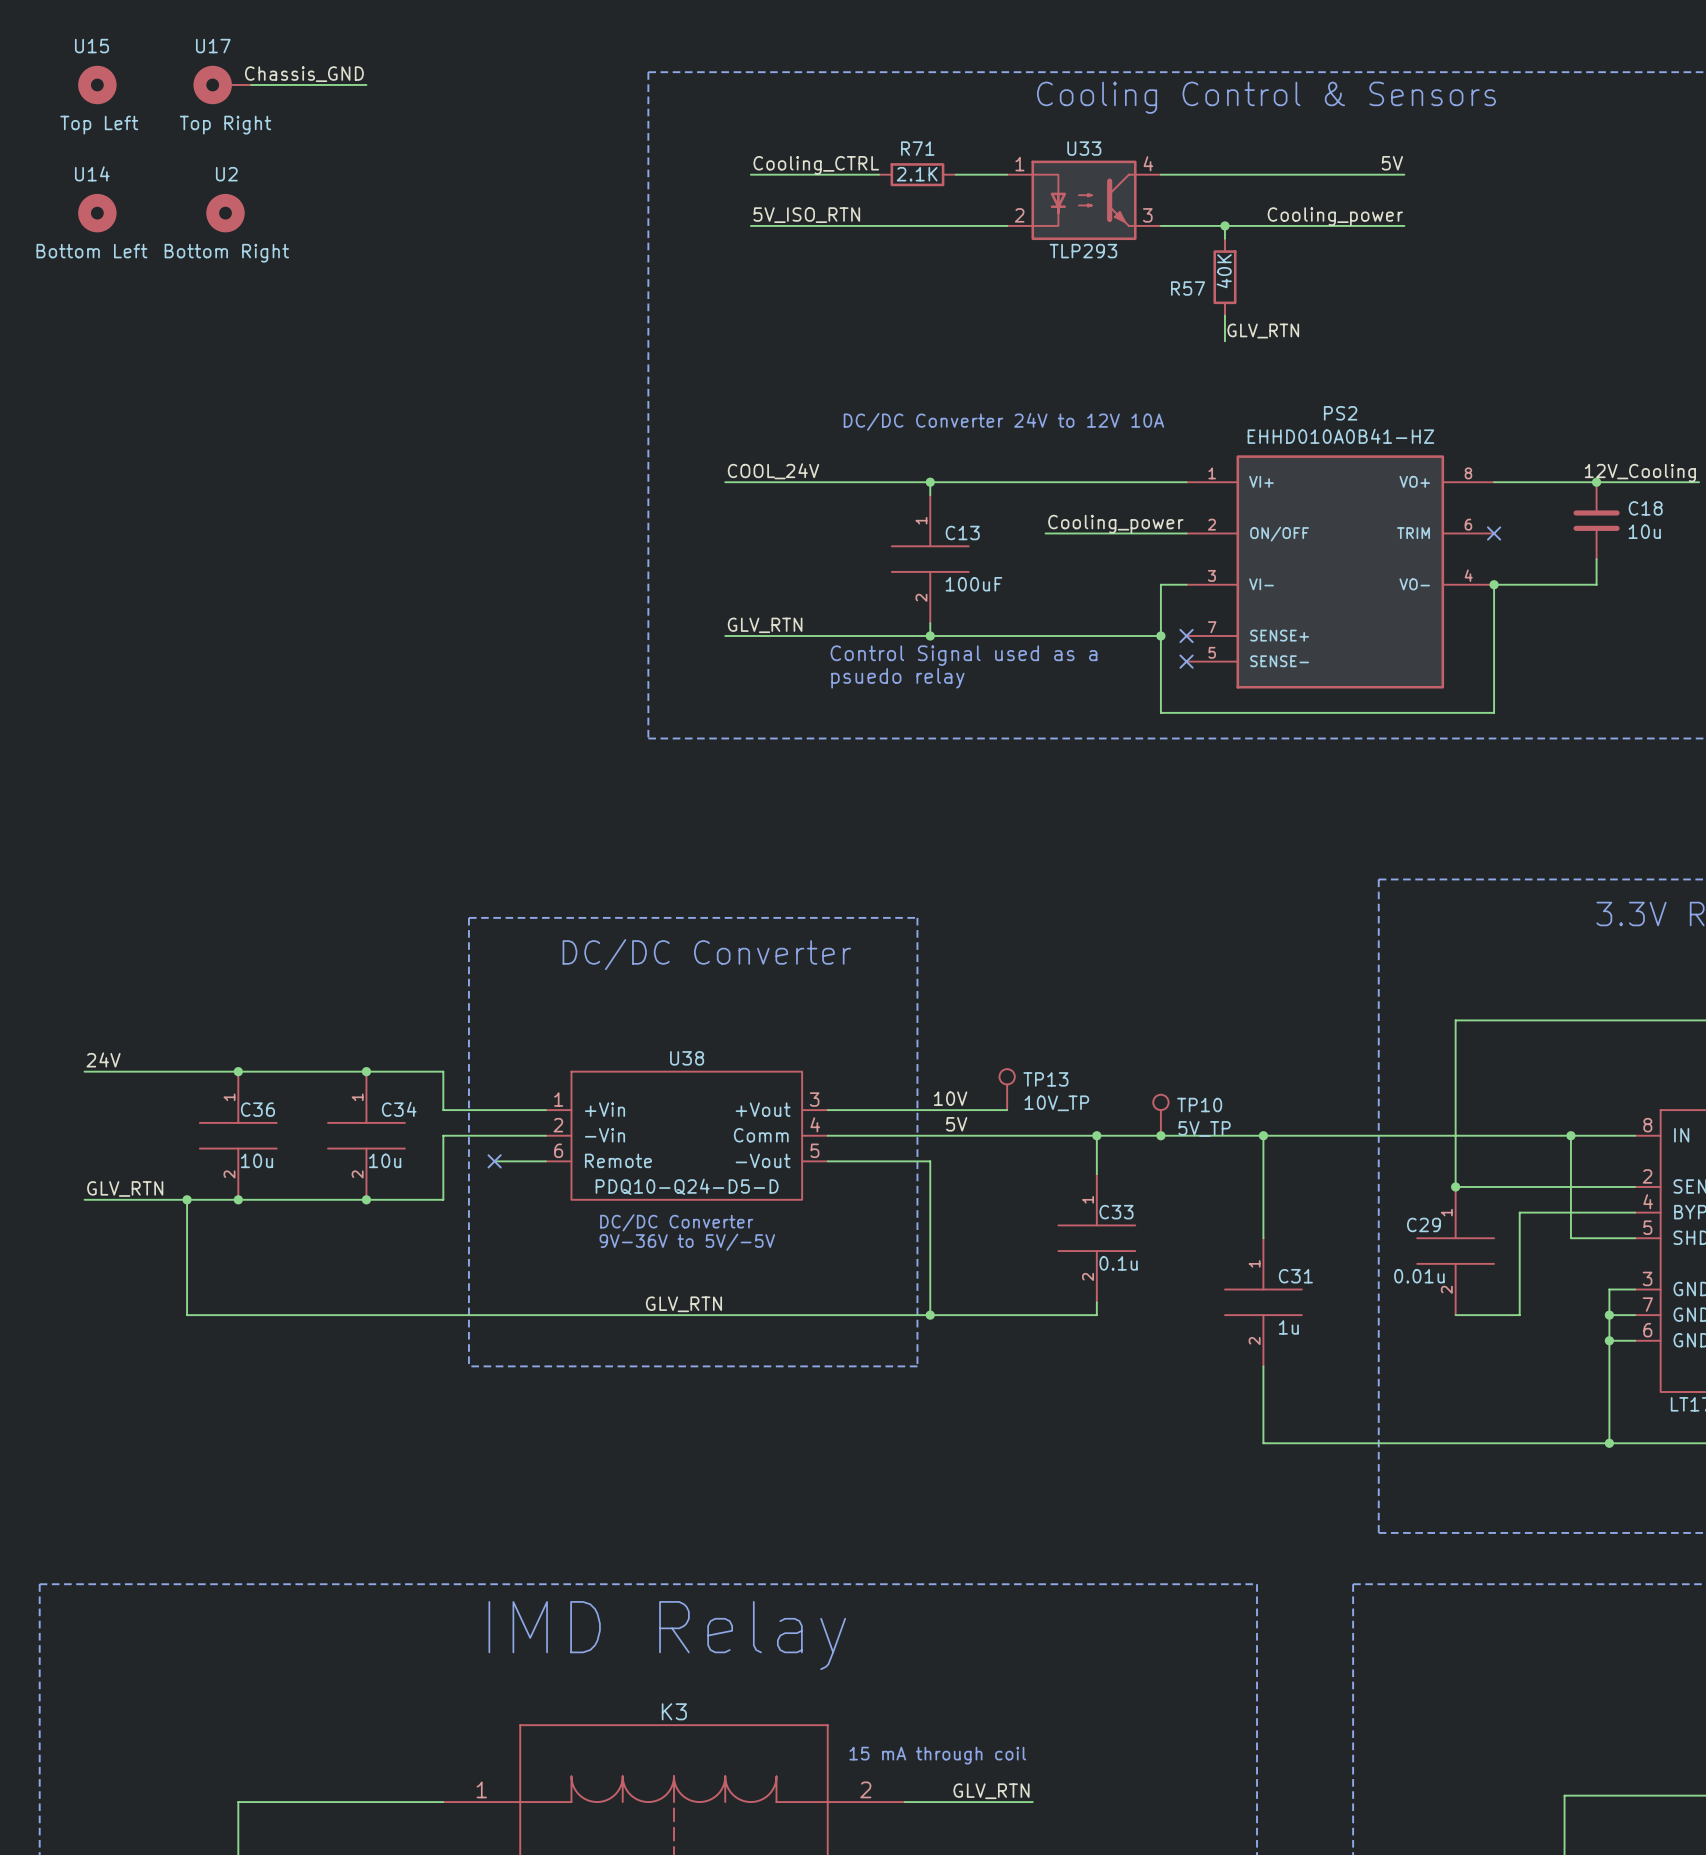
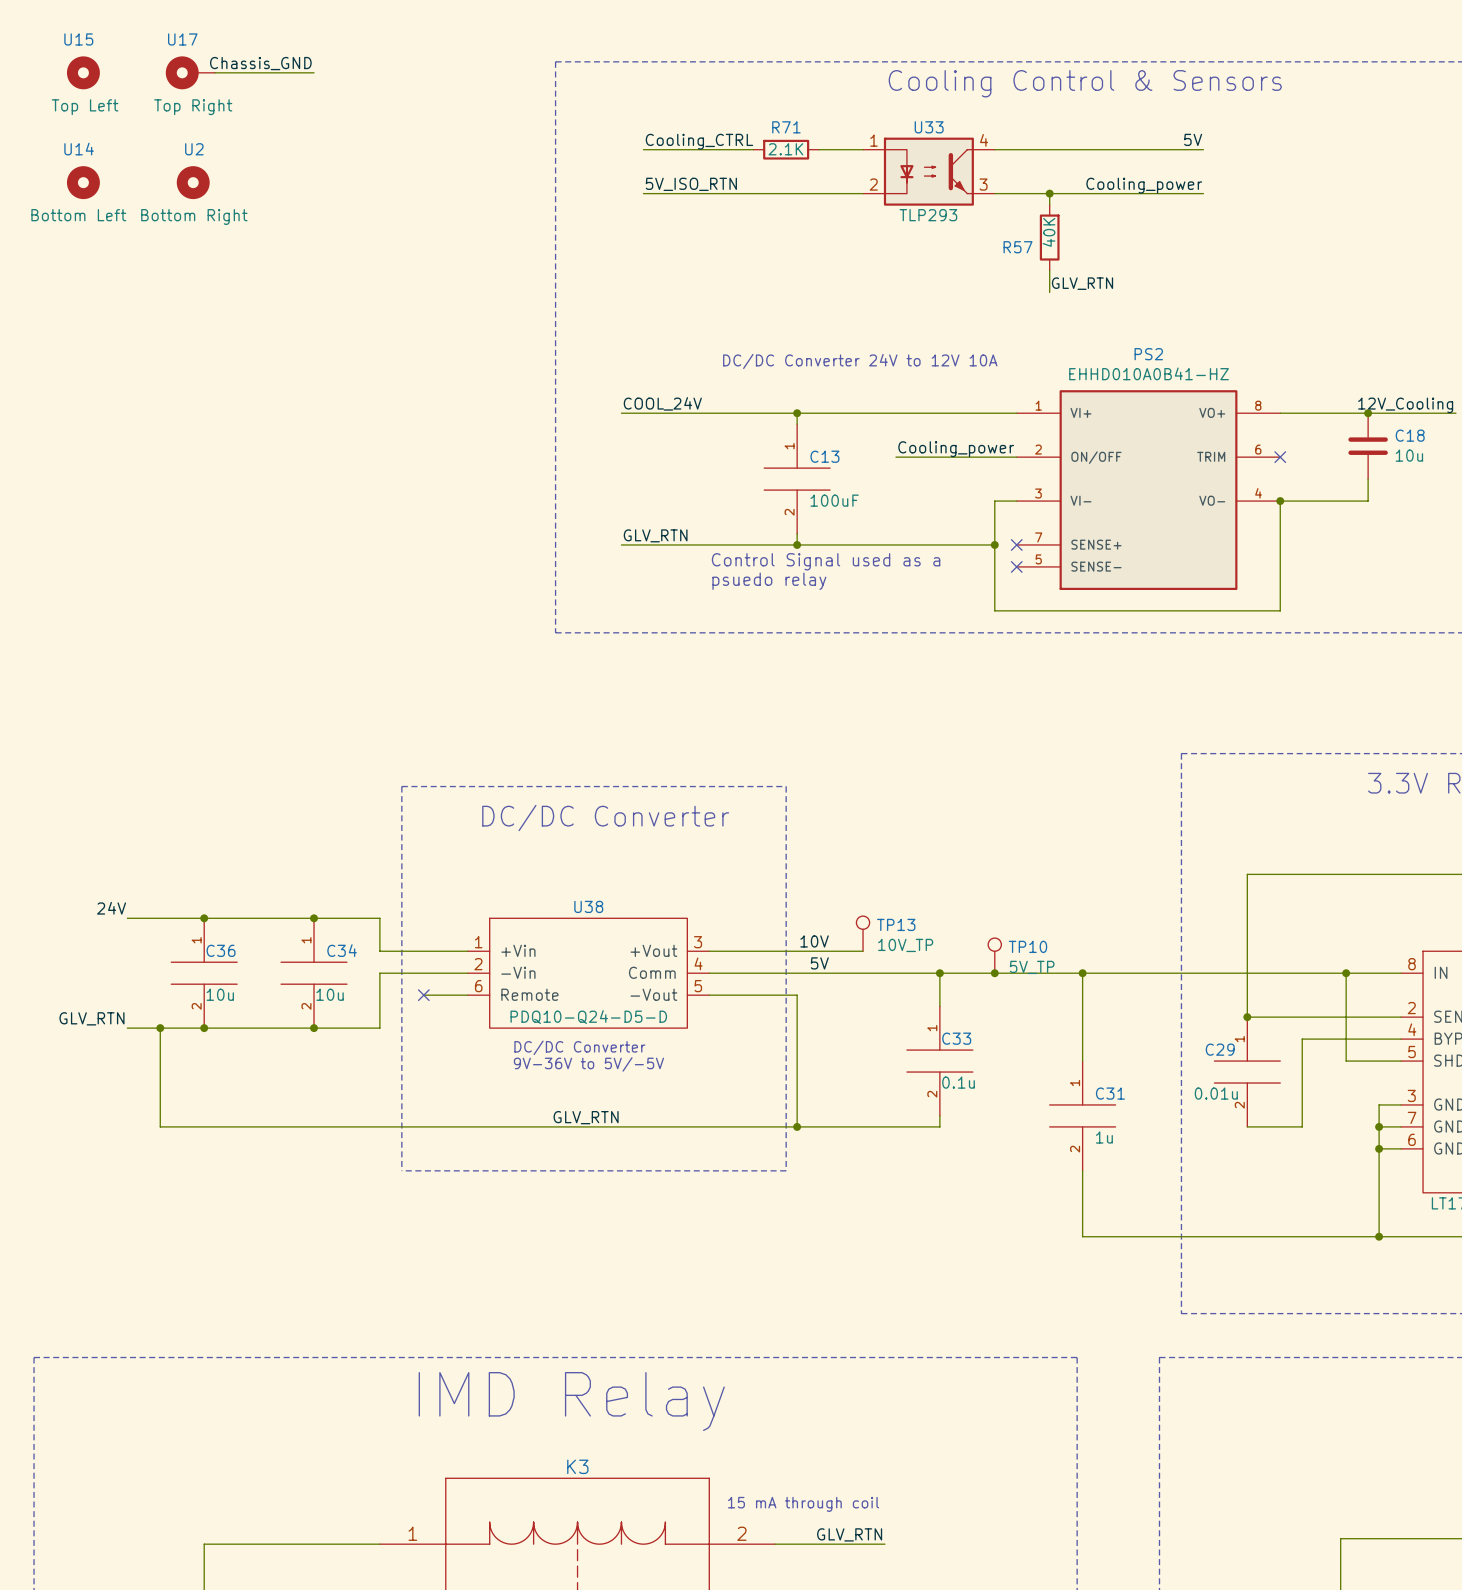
label position: 24V (103, 1059) -> 24V (111, 908)
wire: (84, 1071) (148, 1071) -> none
label position: GLV_RTN (125, 1188) -> GLV_RTN (91, 1018)
wire: (84, 1199) (148, 1199) -> none

